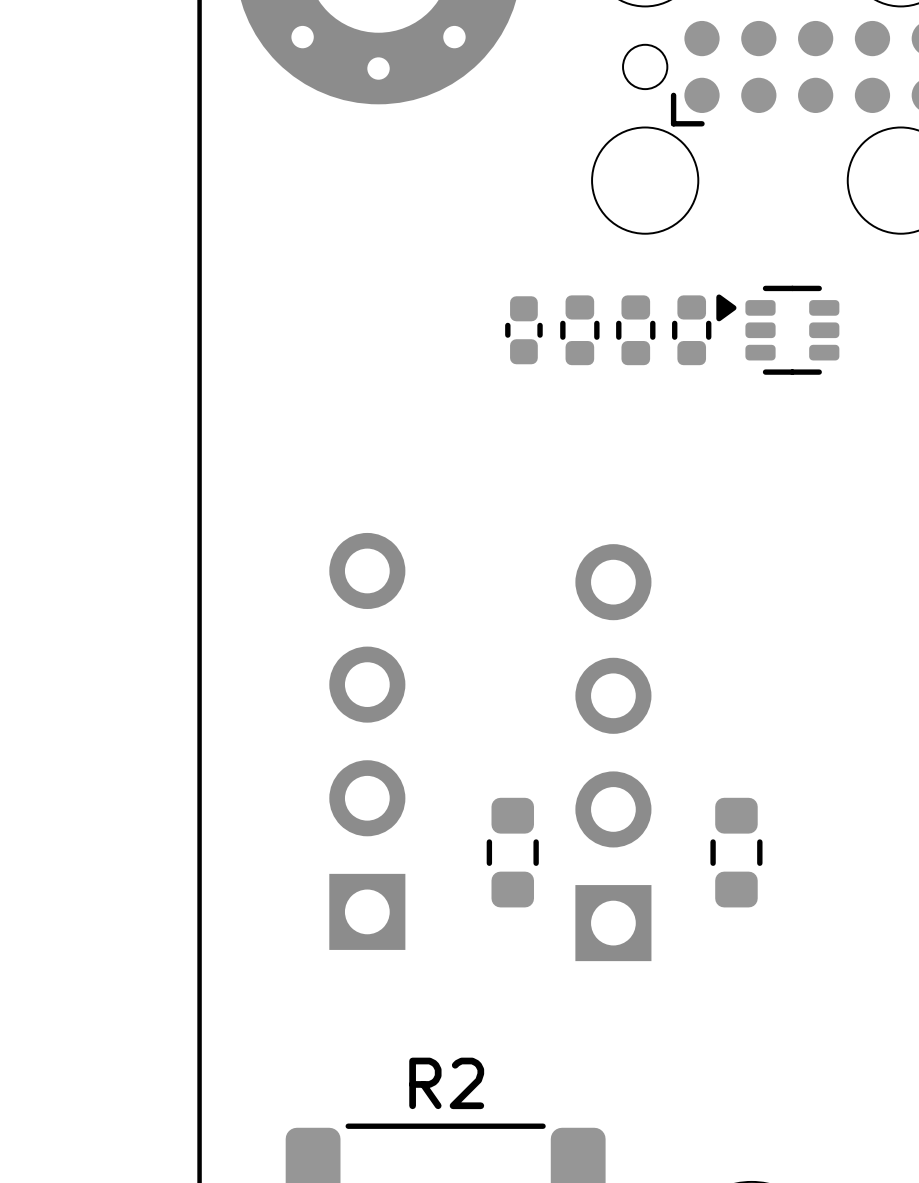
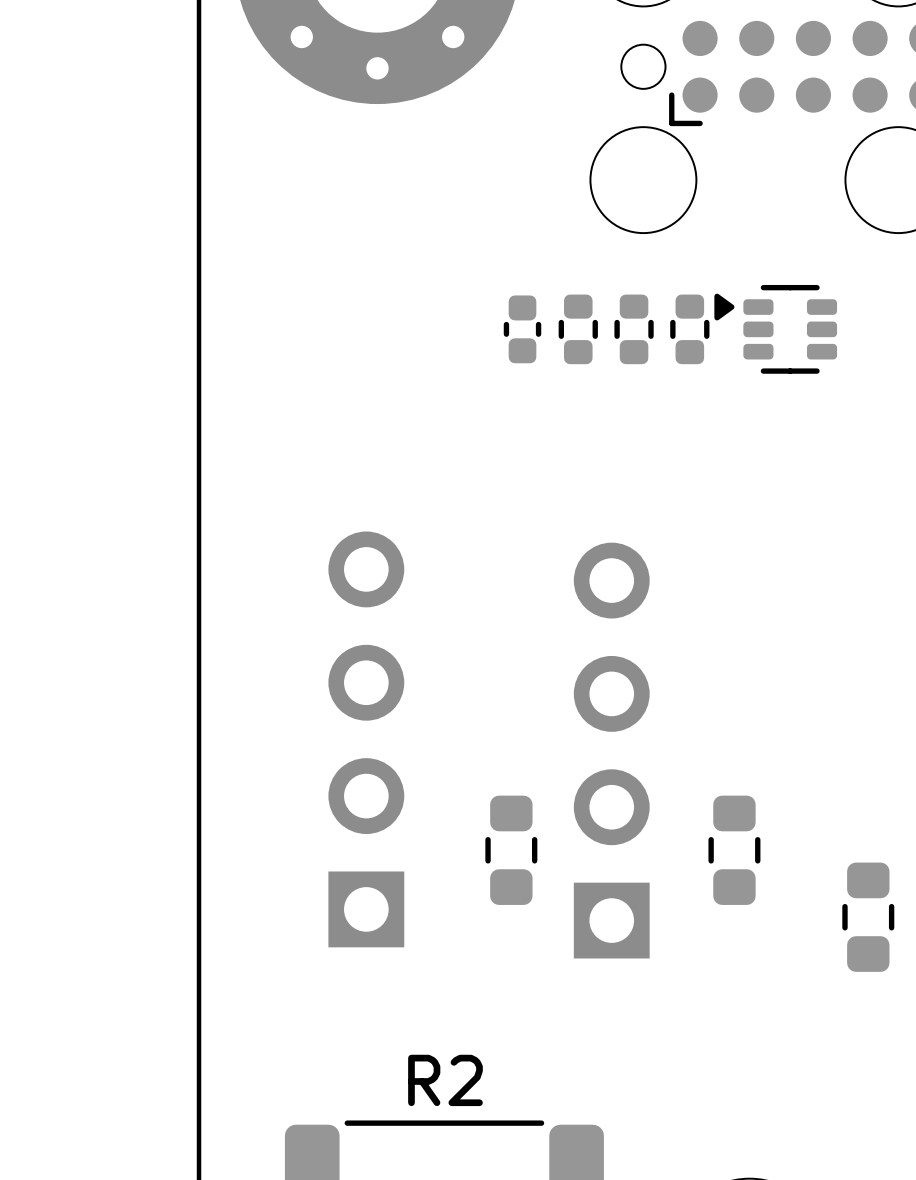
part: none -> (868, 917)

